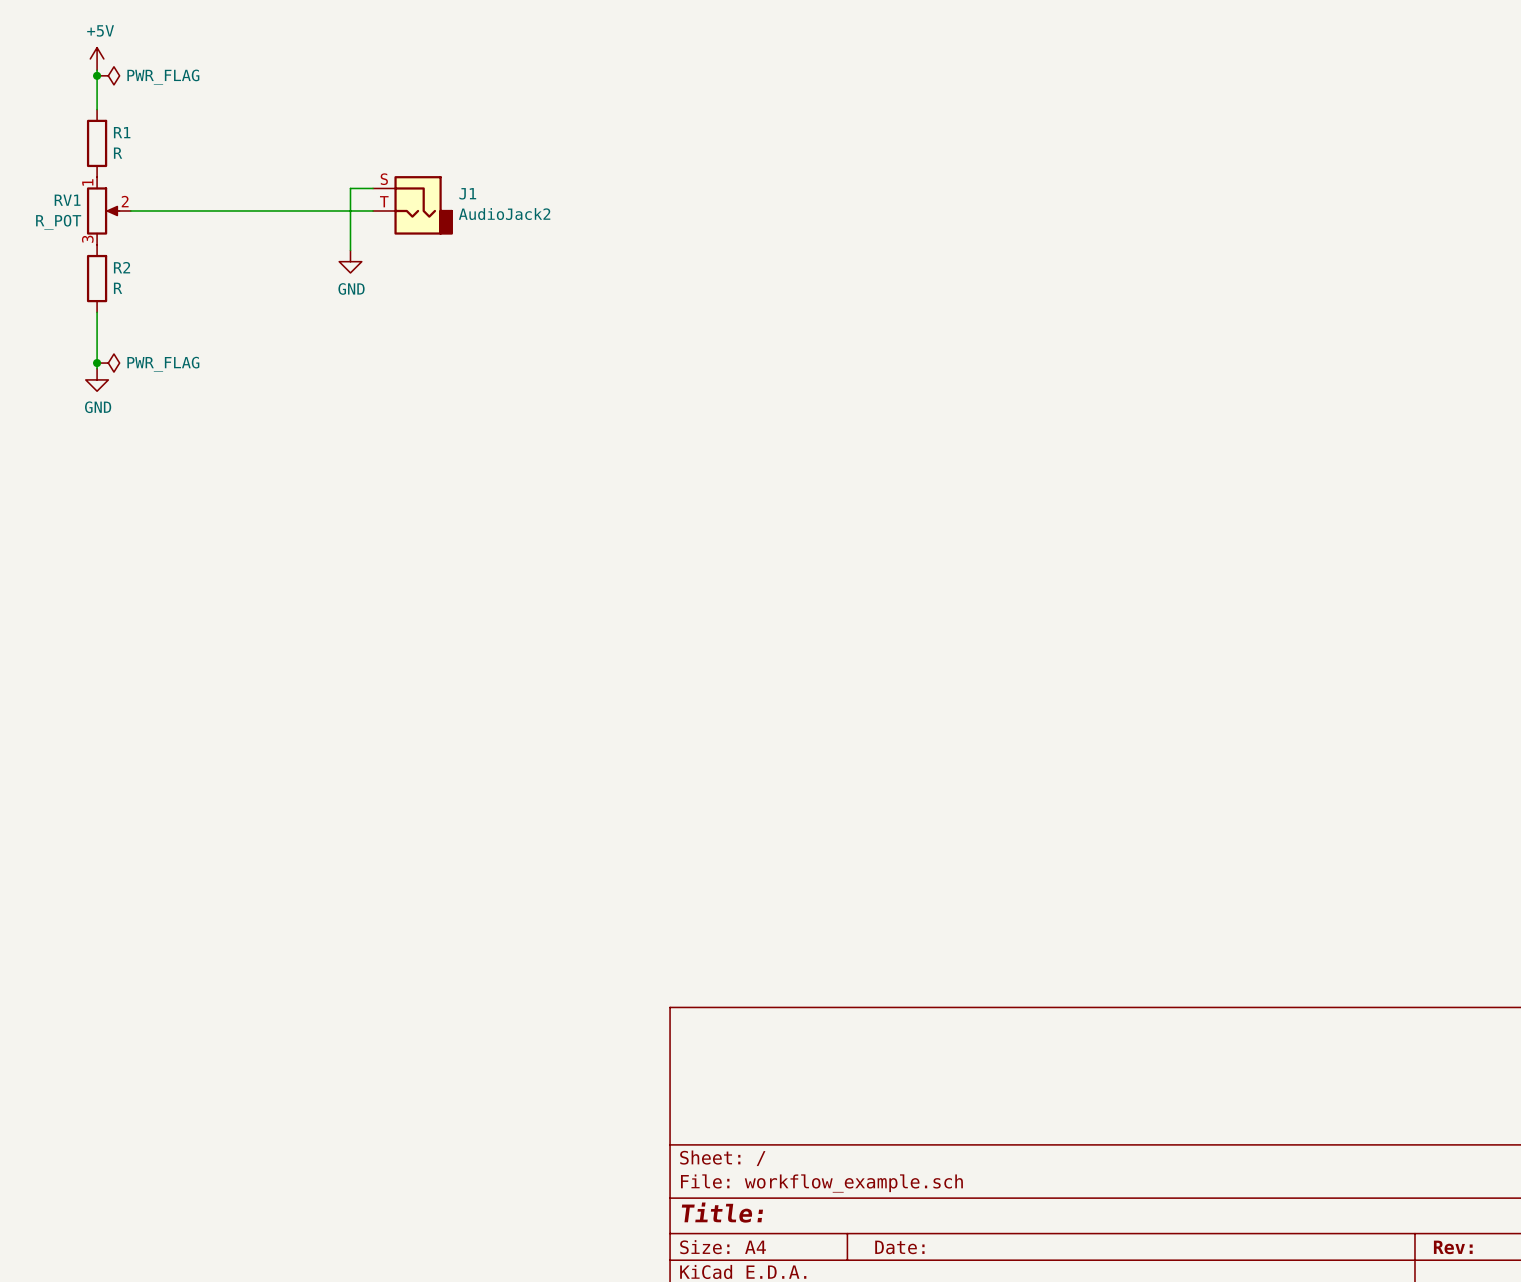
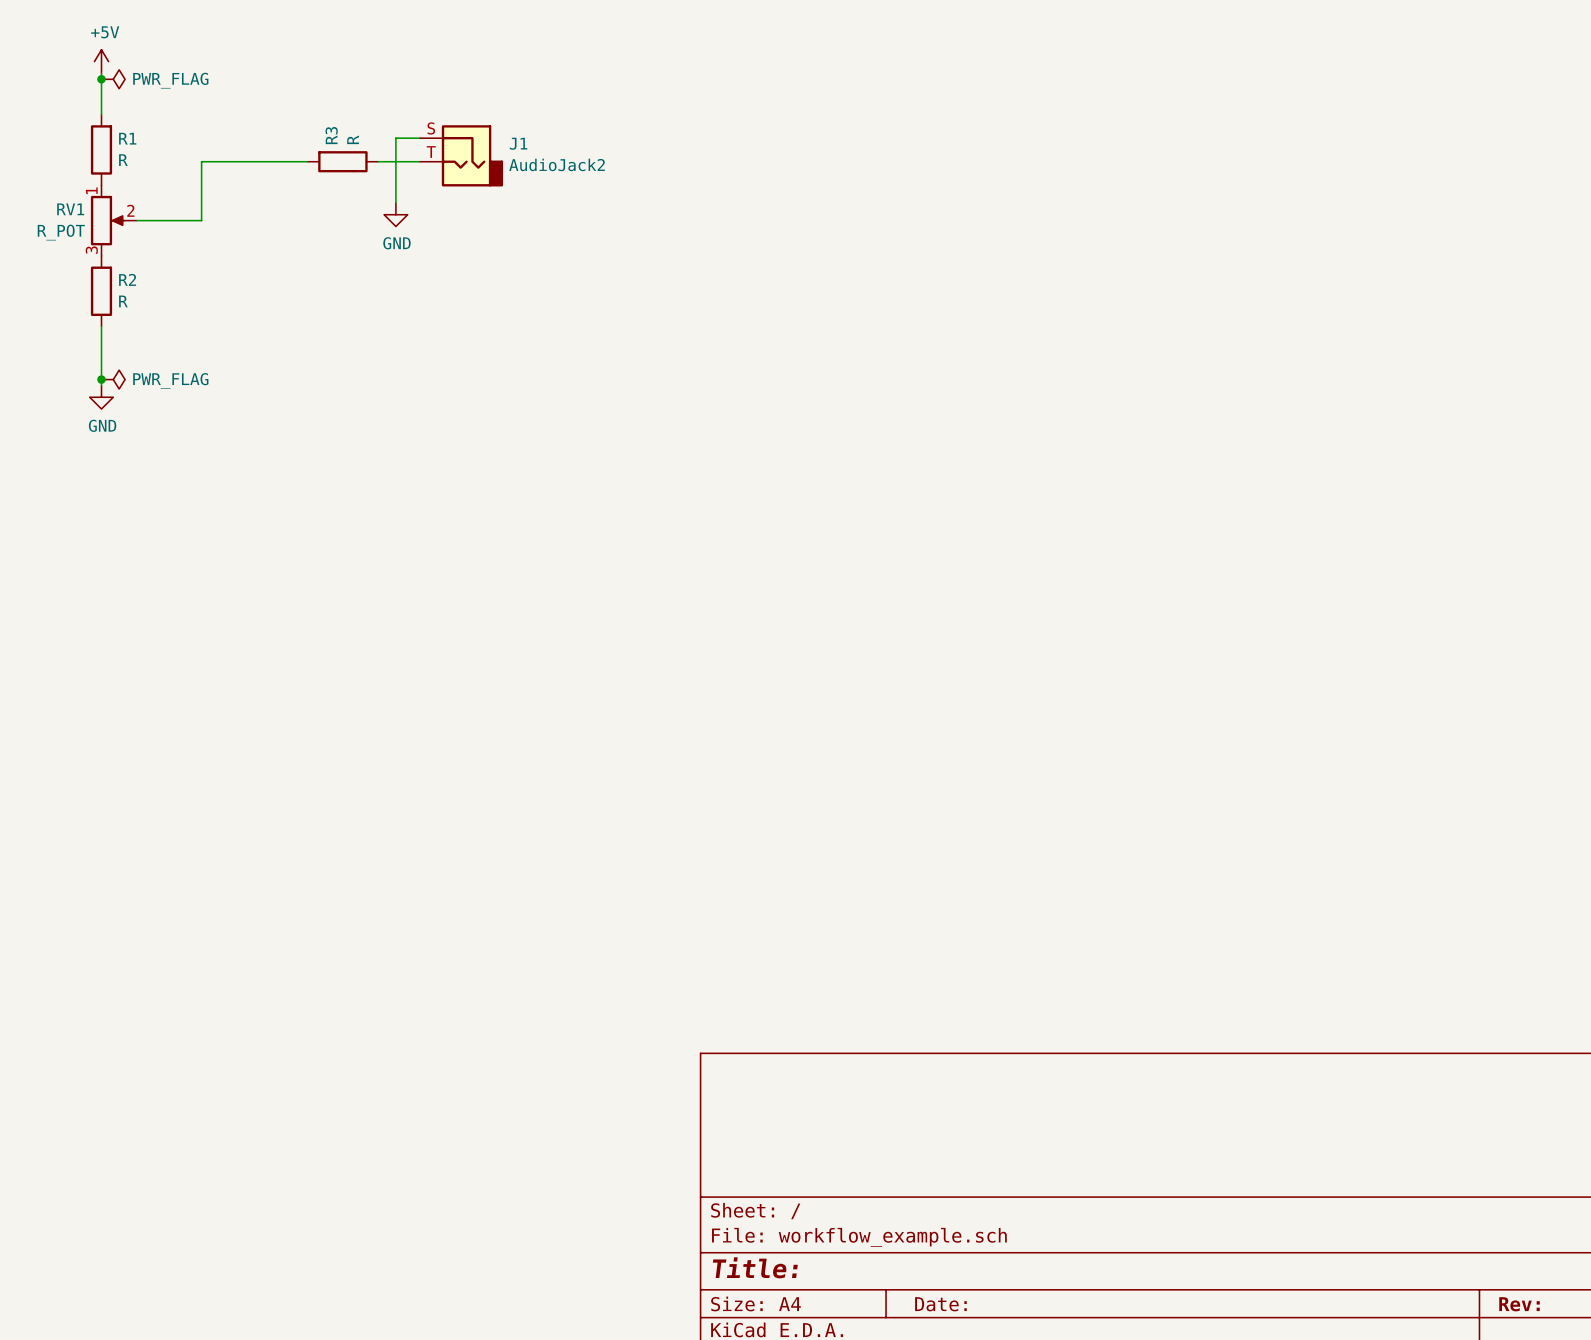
R3: none -> R (342, 161)
wire: none -> (378, 161) (419, 161)
wire: (373, 188) (350, 188) (350, 250) -> (419, 138) (395, 138) (395, 202)
J1 position: (412, 205) -> (461, 155)
wire: (192, 210) (373, 210) -> (201, 220) (201, 161) (307, 161)
power symbol position: GND (350, 261) -> GND (395, 214)

